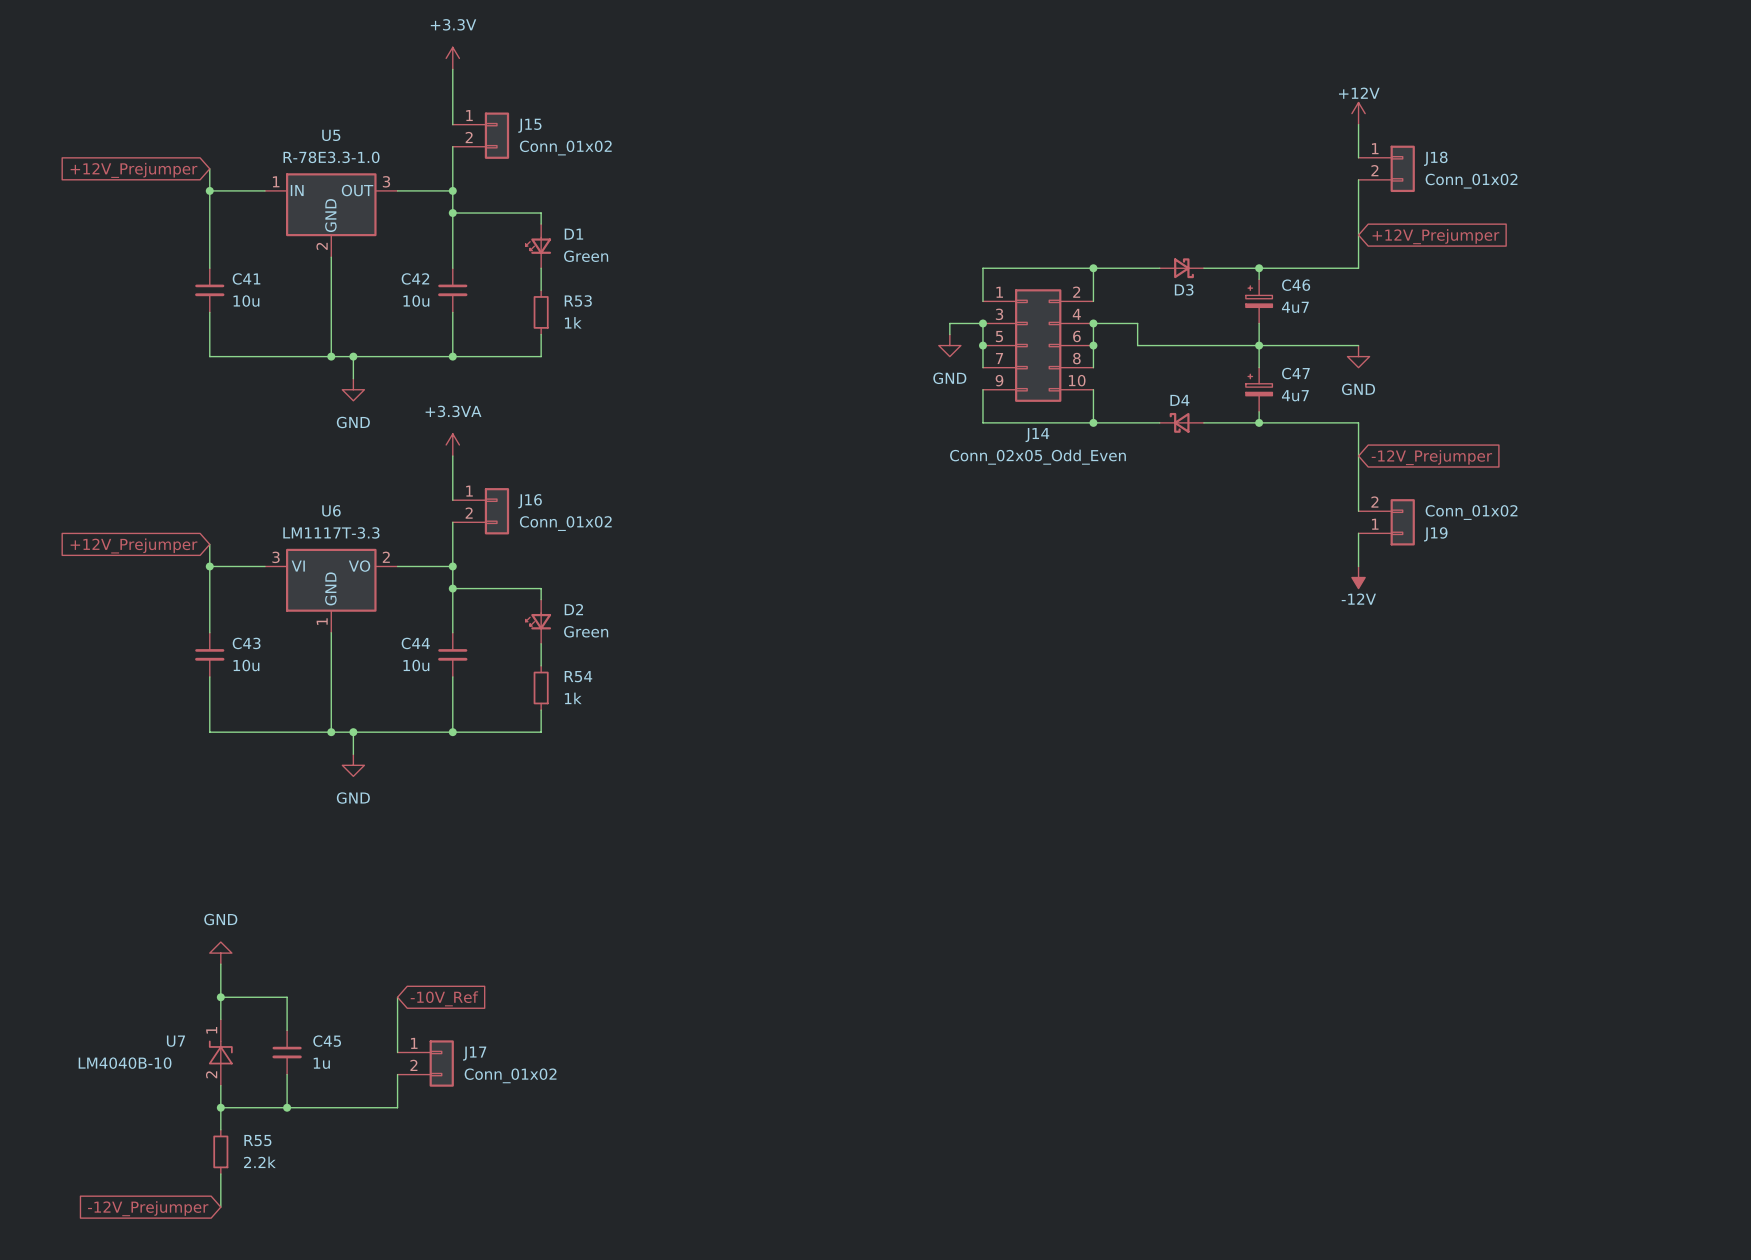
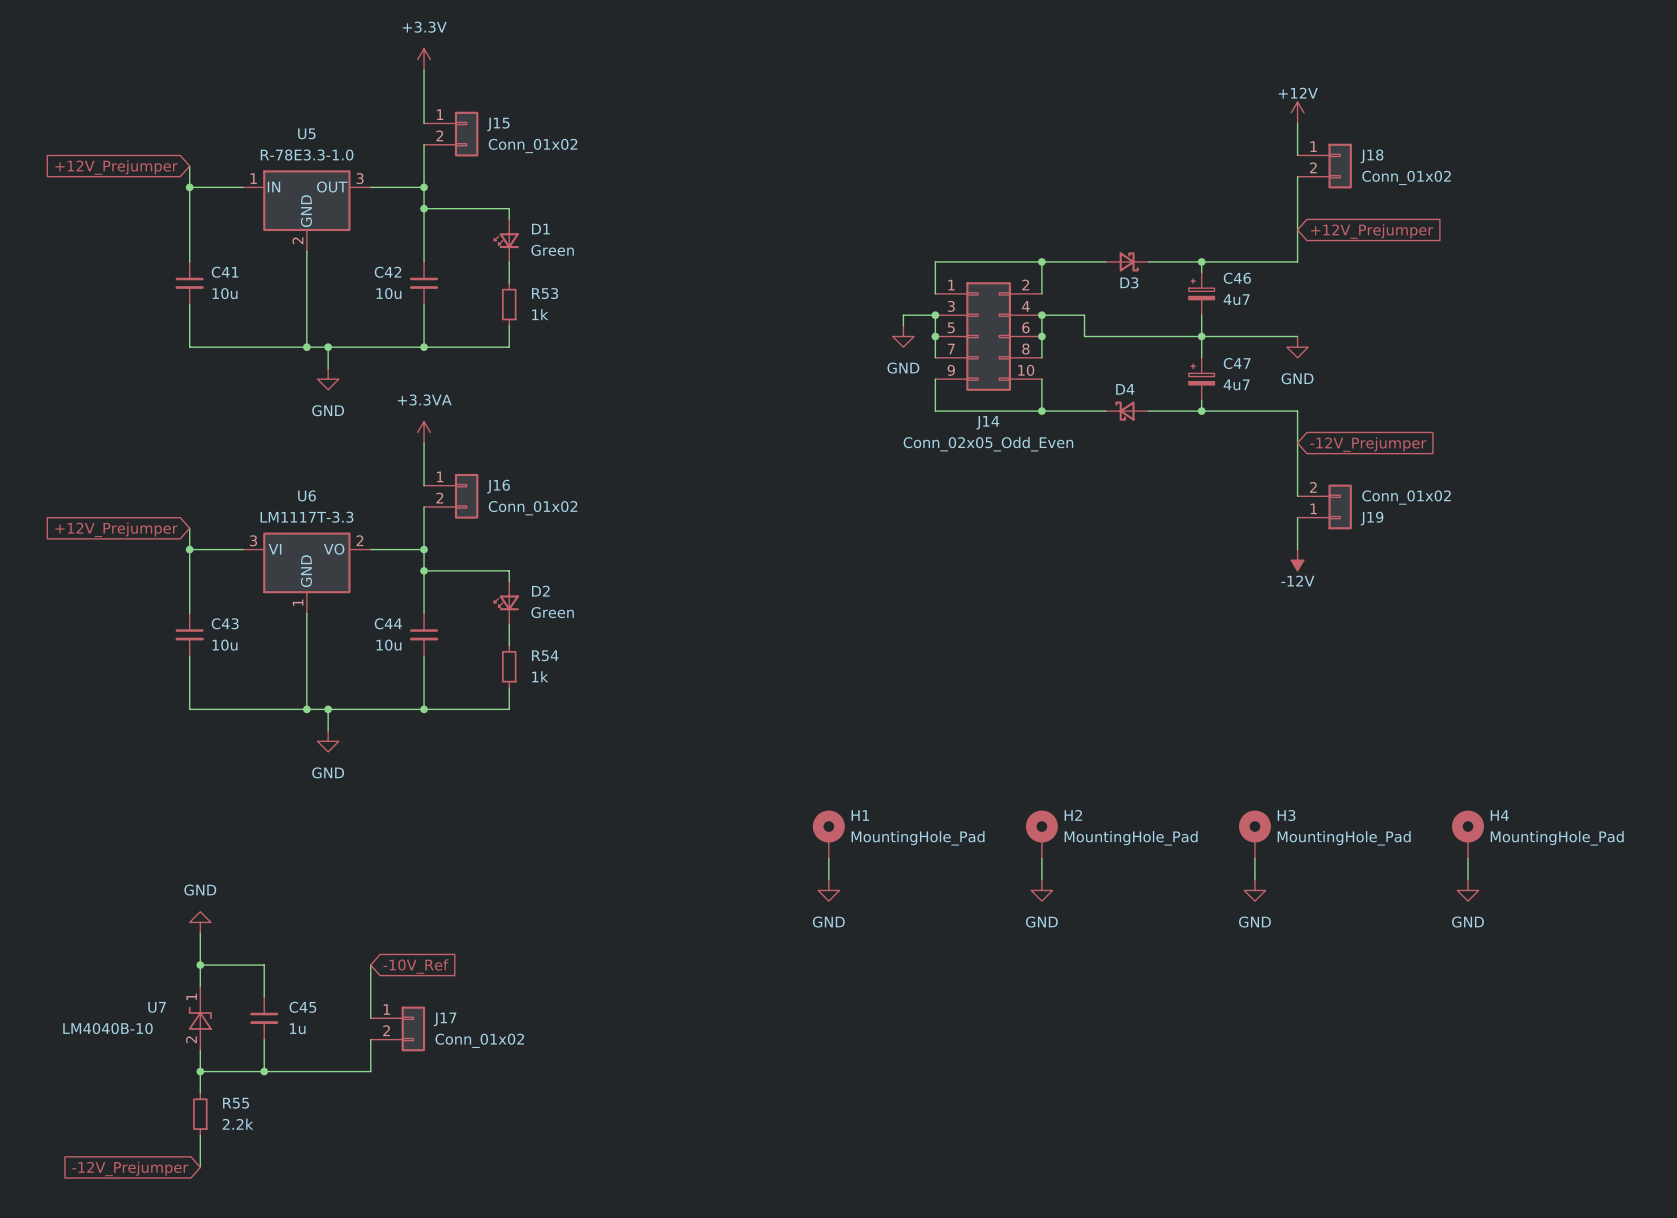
H1: none -> MountingHole_Pad (828, 834)
H2: none -> MountingHole_Pad (1041, 834)
H3: none -> MountingHole_Pad (1254, 834)
H4: none -> MountingHole_Pad (1468, 834)
wire: none -> (828, 858) (828, 879)
wire: none -> (1041, 858) (1041, 879)
wire: none -> (1254, 858) (1254, 879)
wire: none -> (1468, 858) (1468, 879)
power symbol: none -> GND (828, 890)
power symbol: none -> GND (1041, 890)
power symbol: none -> GND (1254, 890)
power symbol: none -> GND (1468, 890)

